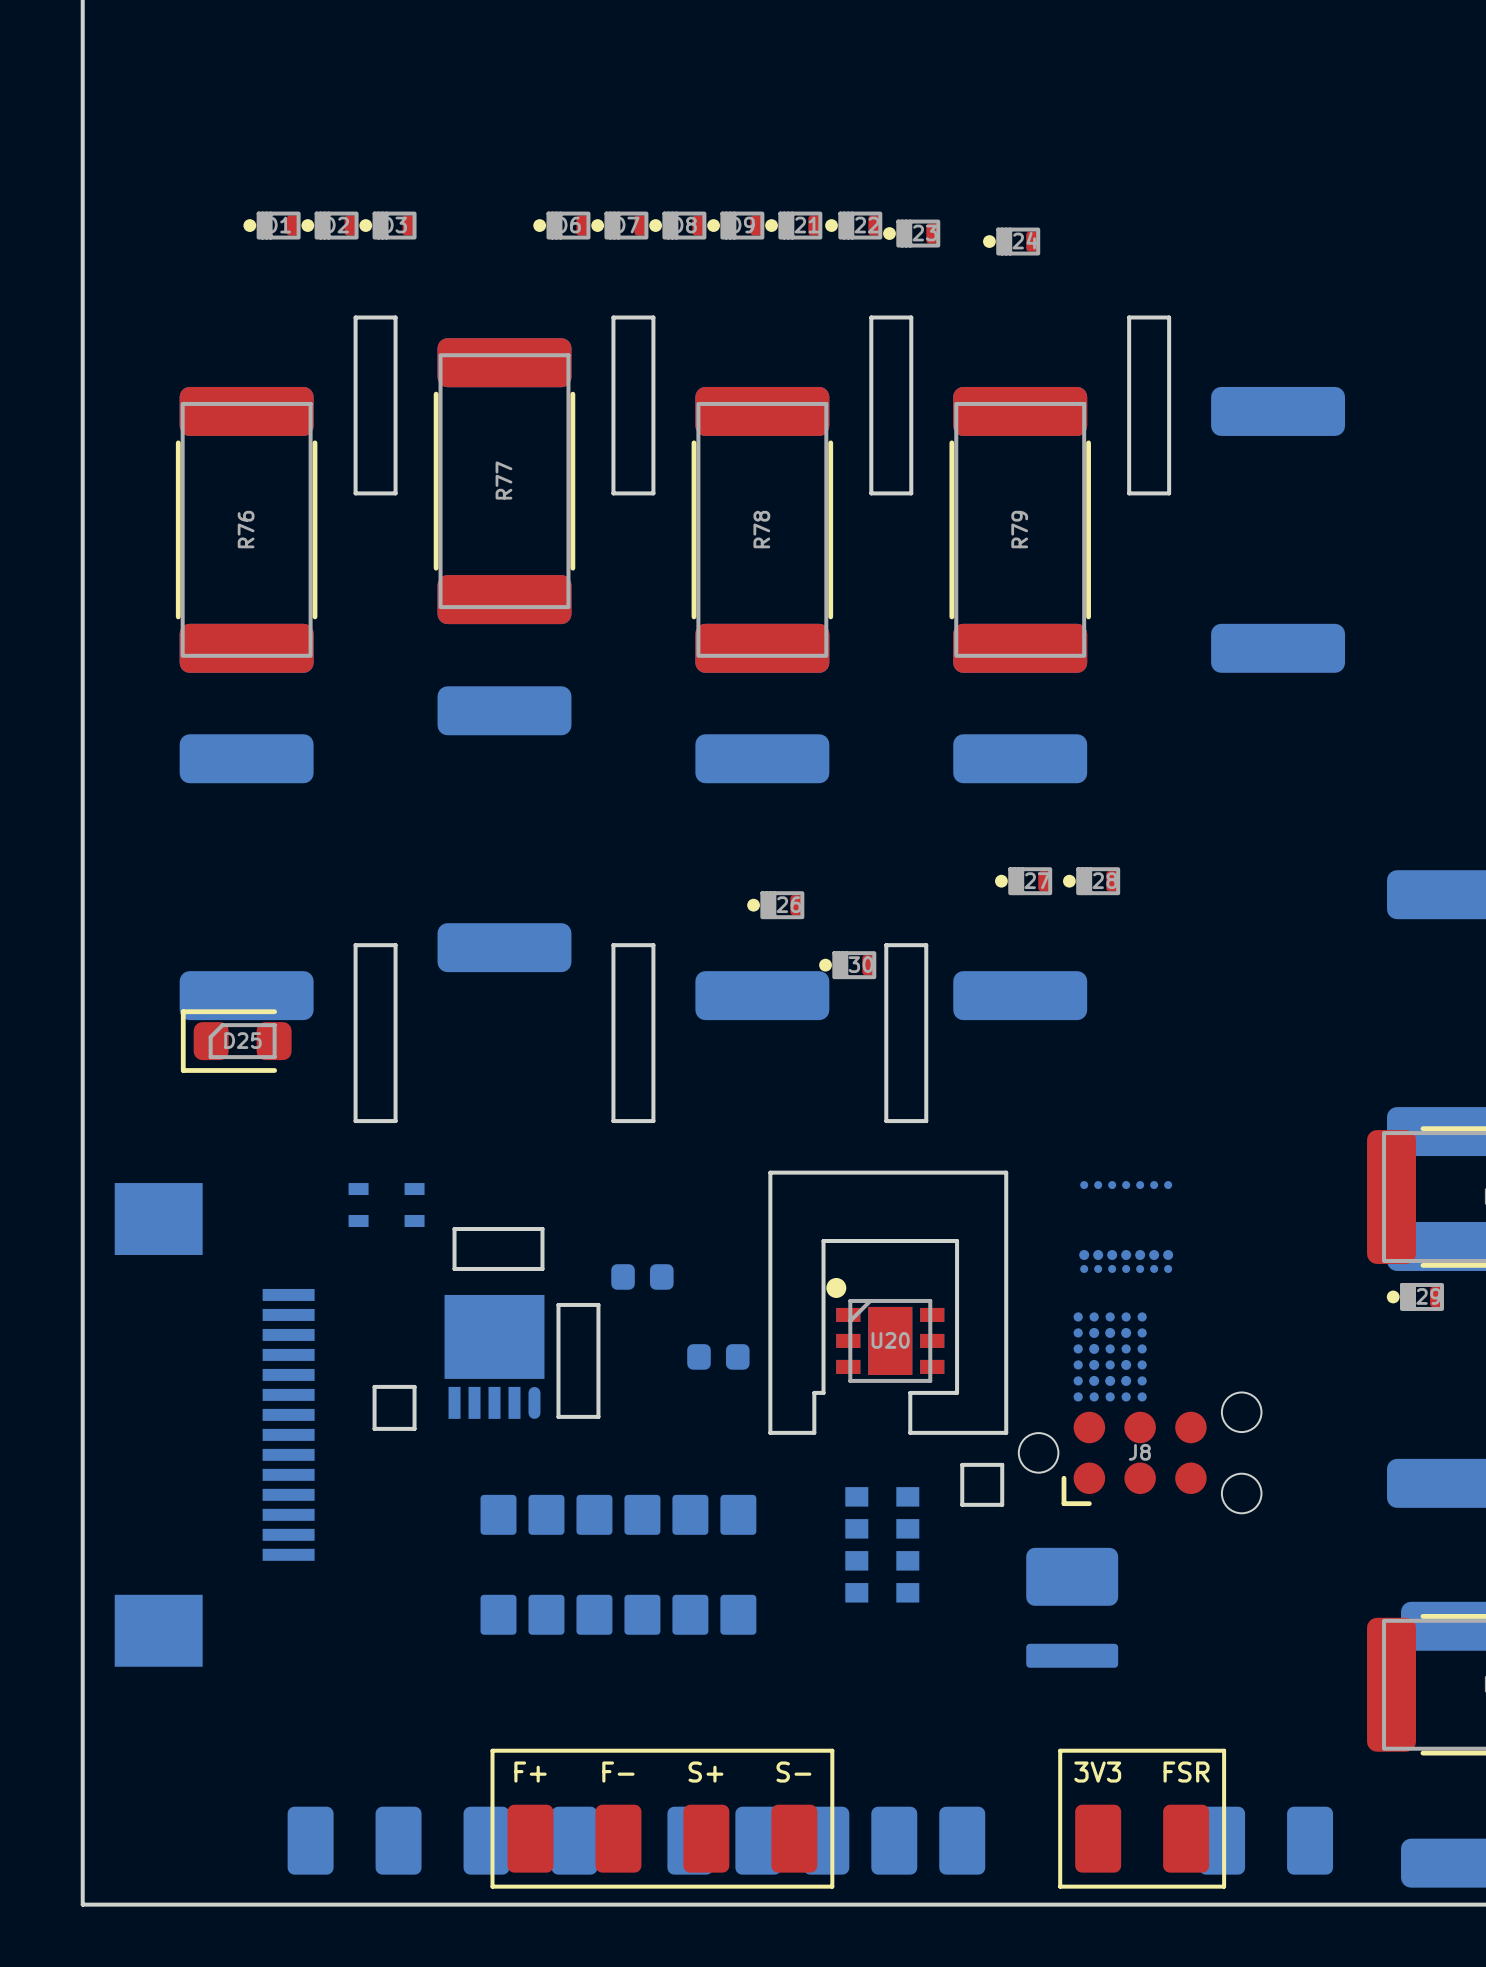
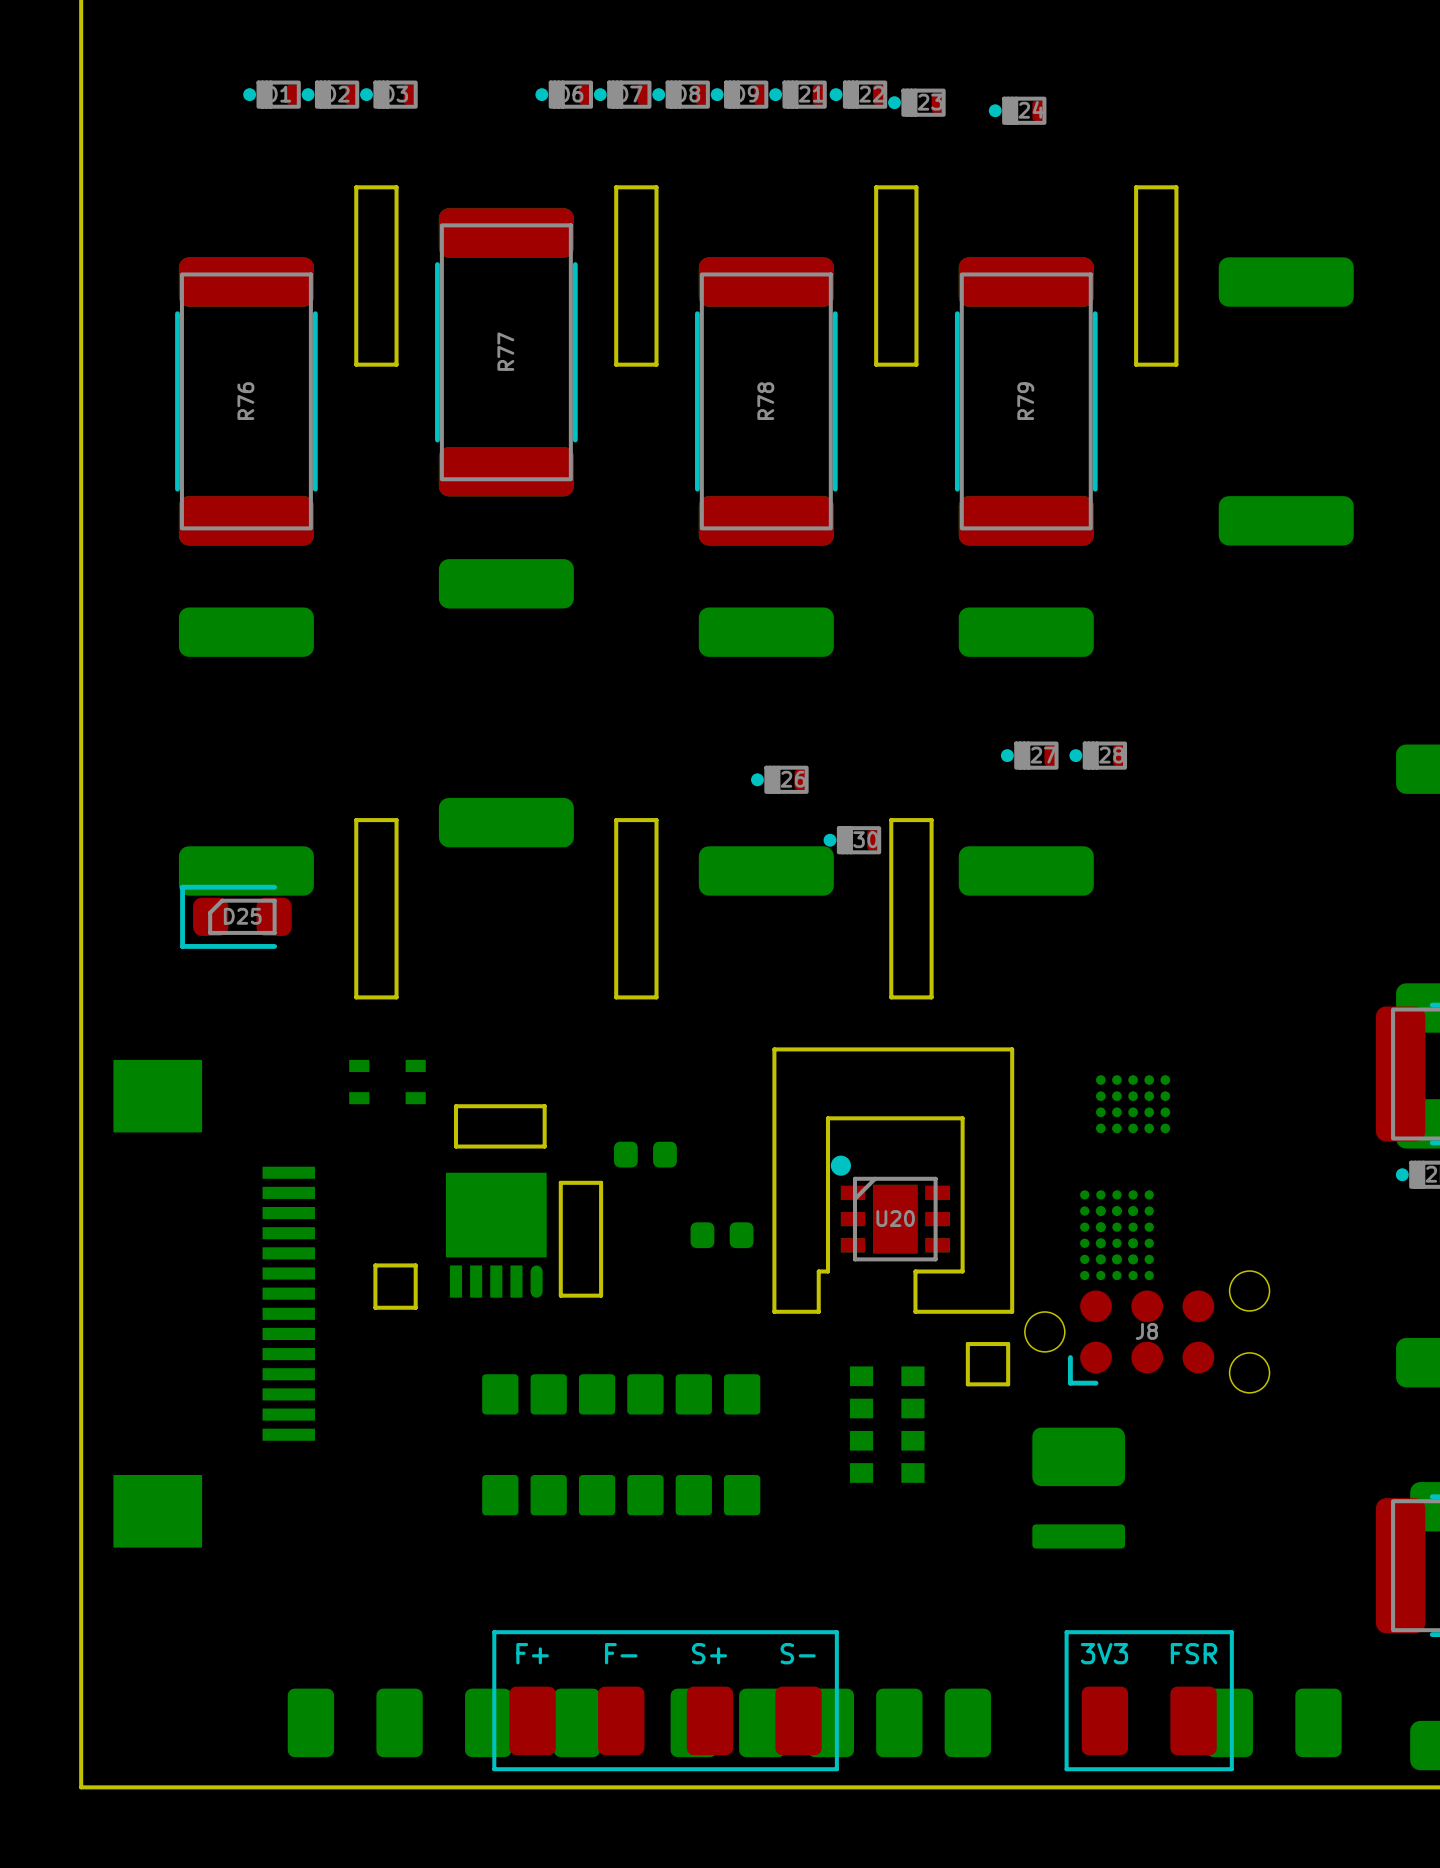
part footprint: [1079, 1181, 1174, 1273] -> [1096, 1075, 1171, 1134]

